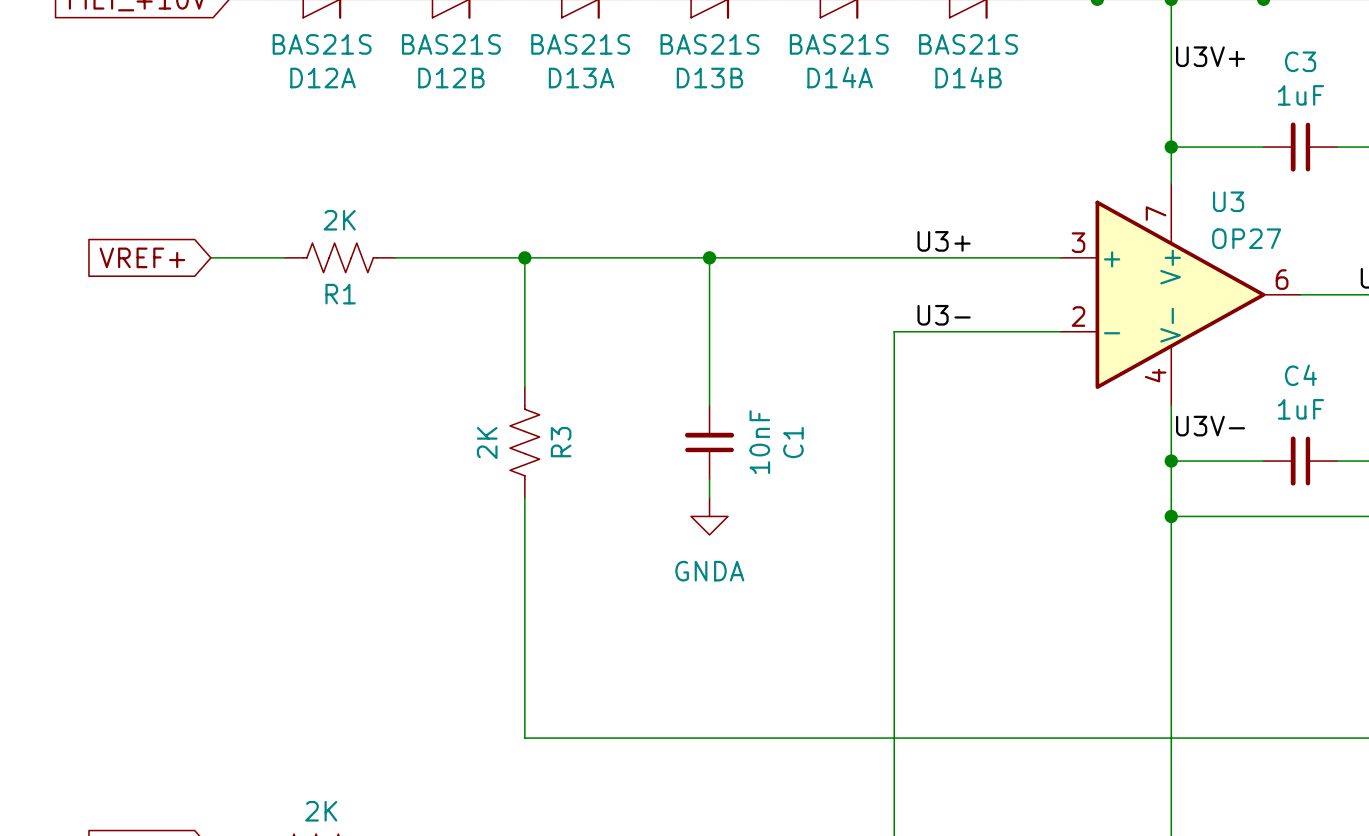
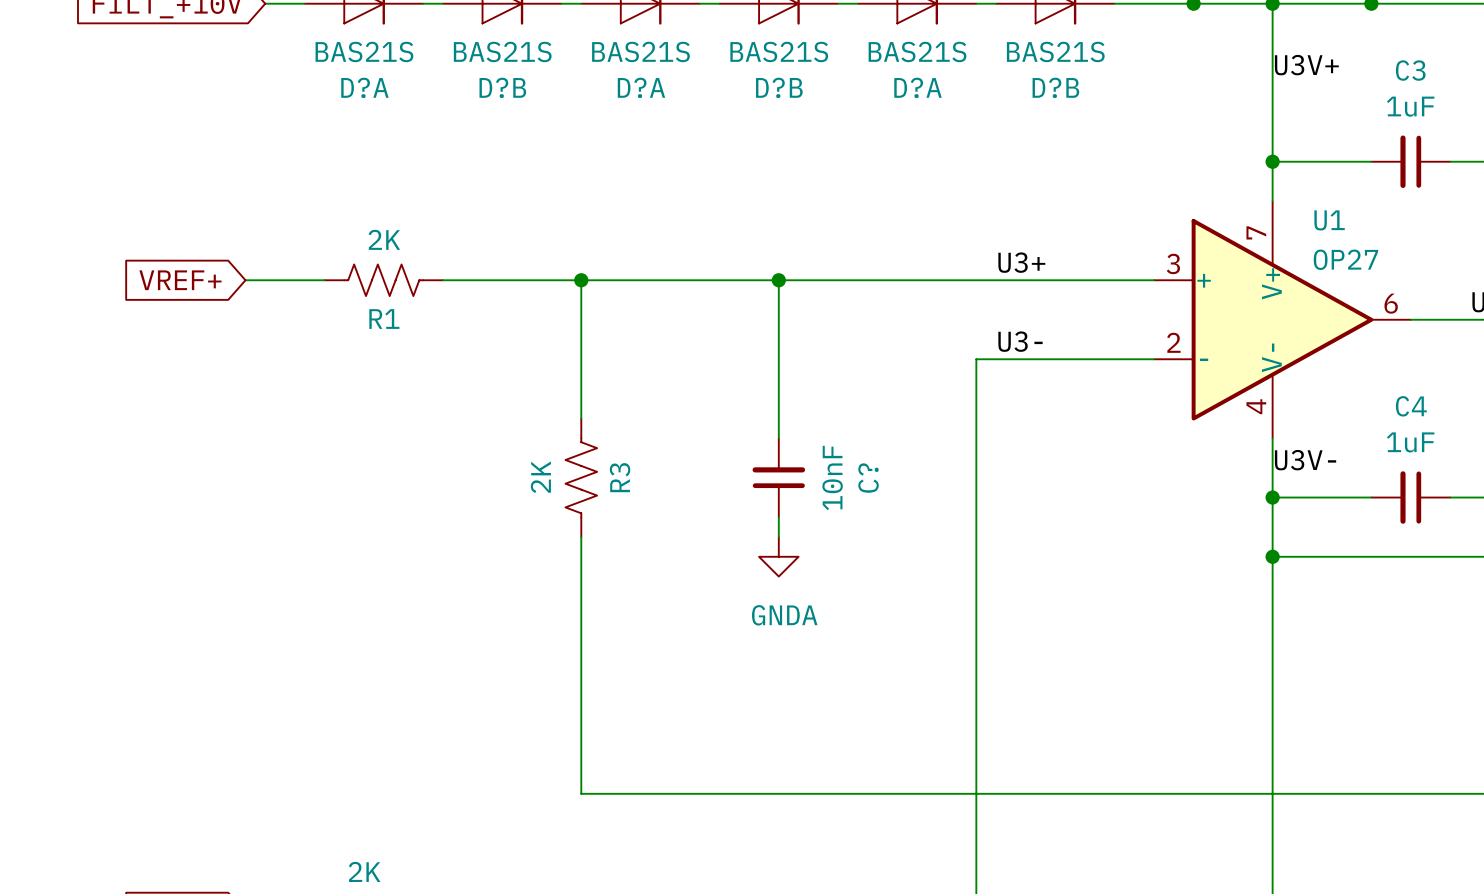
D14A name: D14A (840, 77) -> D?A (918, 87)
D14B name: D14B (968, 77) -> D?B (1055, 87)
D12A name: D12A (323, 78) -> D?A (364, 87)
D12B name: D12B (451, 78) -> D?B (502, 87)
D13A name: D13A (581, 78) -> D?A (641, 87)
D13B name: D13B (709, 78) -> D?B (779, 87)
U3 name: U3 (1228, 201) -> U1 (1329, 220)
C1 name: C1 (793, 442) -> C? (868, 478)

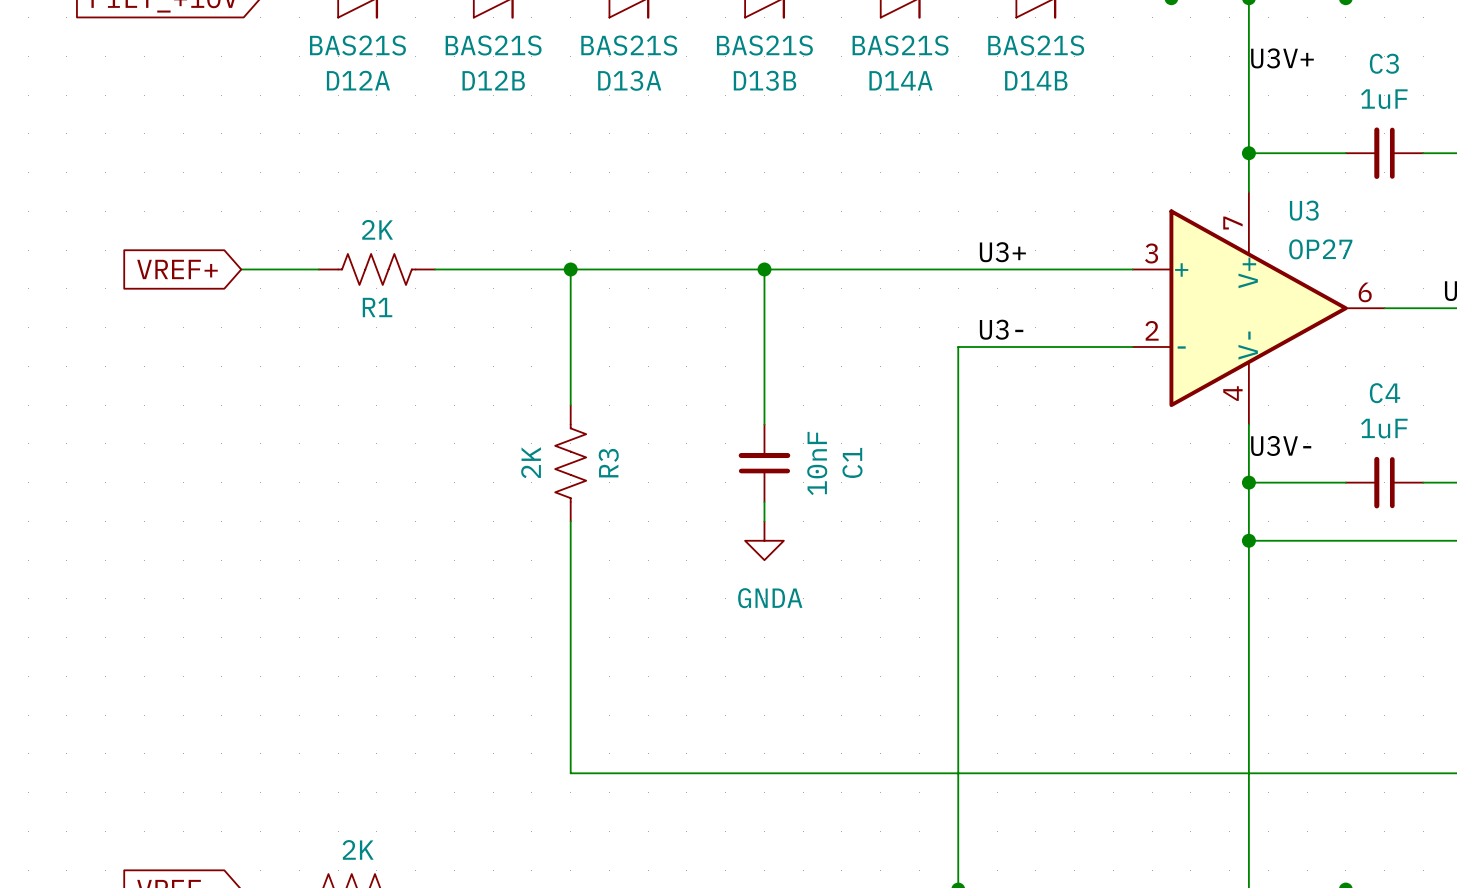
D?A name: D?A (364, 87) -> D12A (358, 80)
D?B name: D?B (502, 87) -> D12B (493, 80)
D?A name: D?A (641, 87) -> D13A (629, 80)
D?B name: D?B (779, 87) -> D13B (765, 80)
D?A name: D?A (918, 87) -> D14A (901, 80)
D?B name: D?B (1055, 87) -> D14B (1036, 80)
U1 name: U1 (1329, 220) -> U3 (1304, 210)
C? name: C? (868, 478) -> C1 (852, 462)

